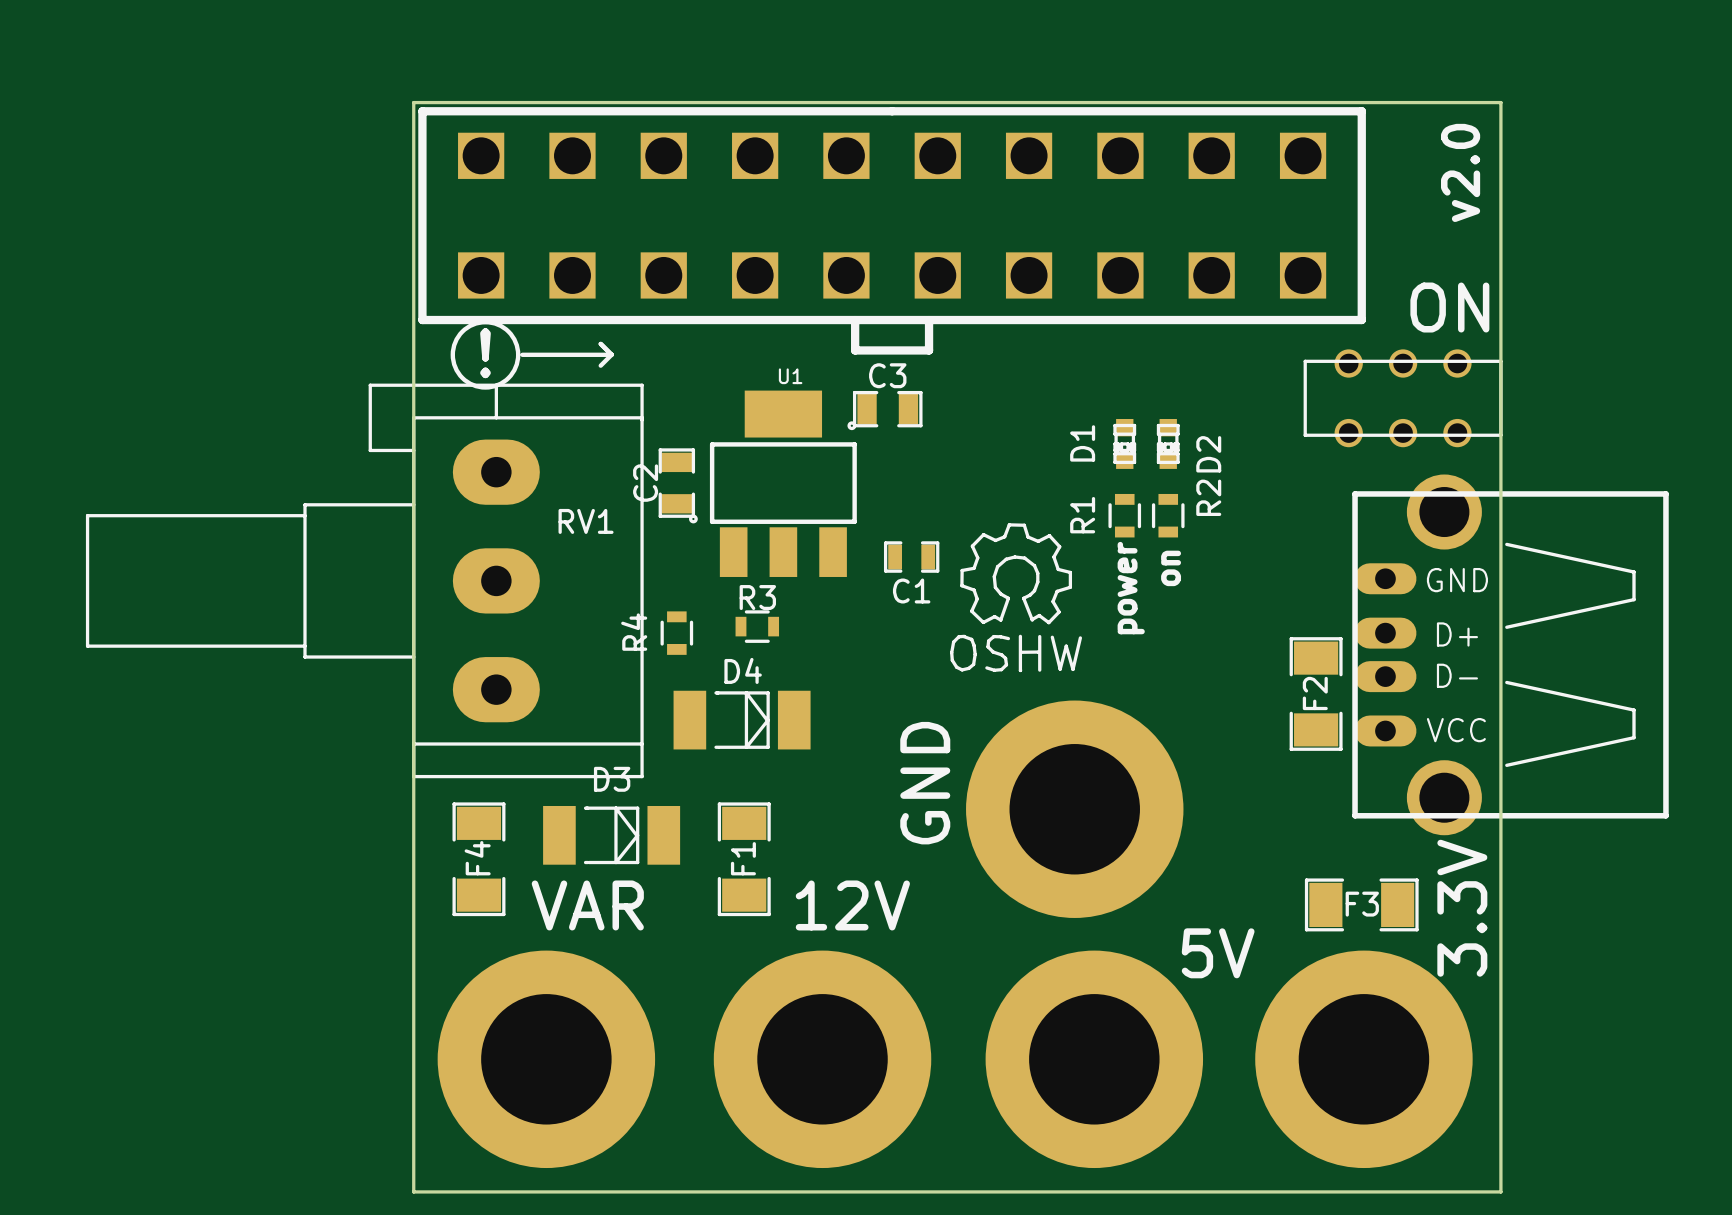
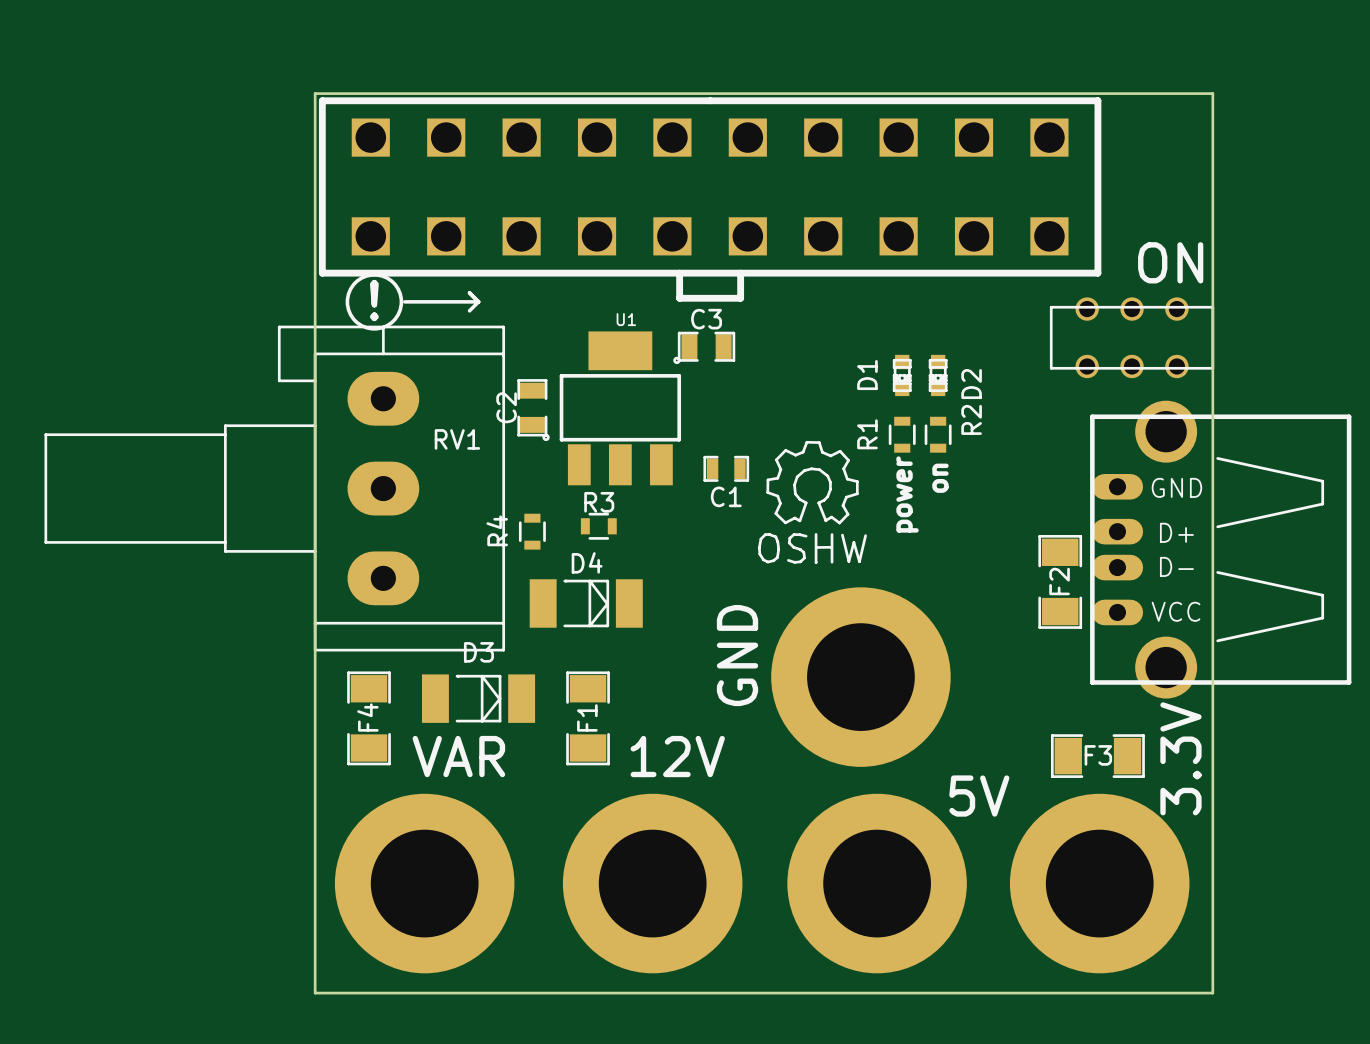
text: v2.0 (1460, 172) -> none

